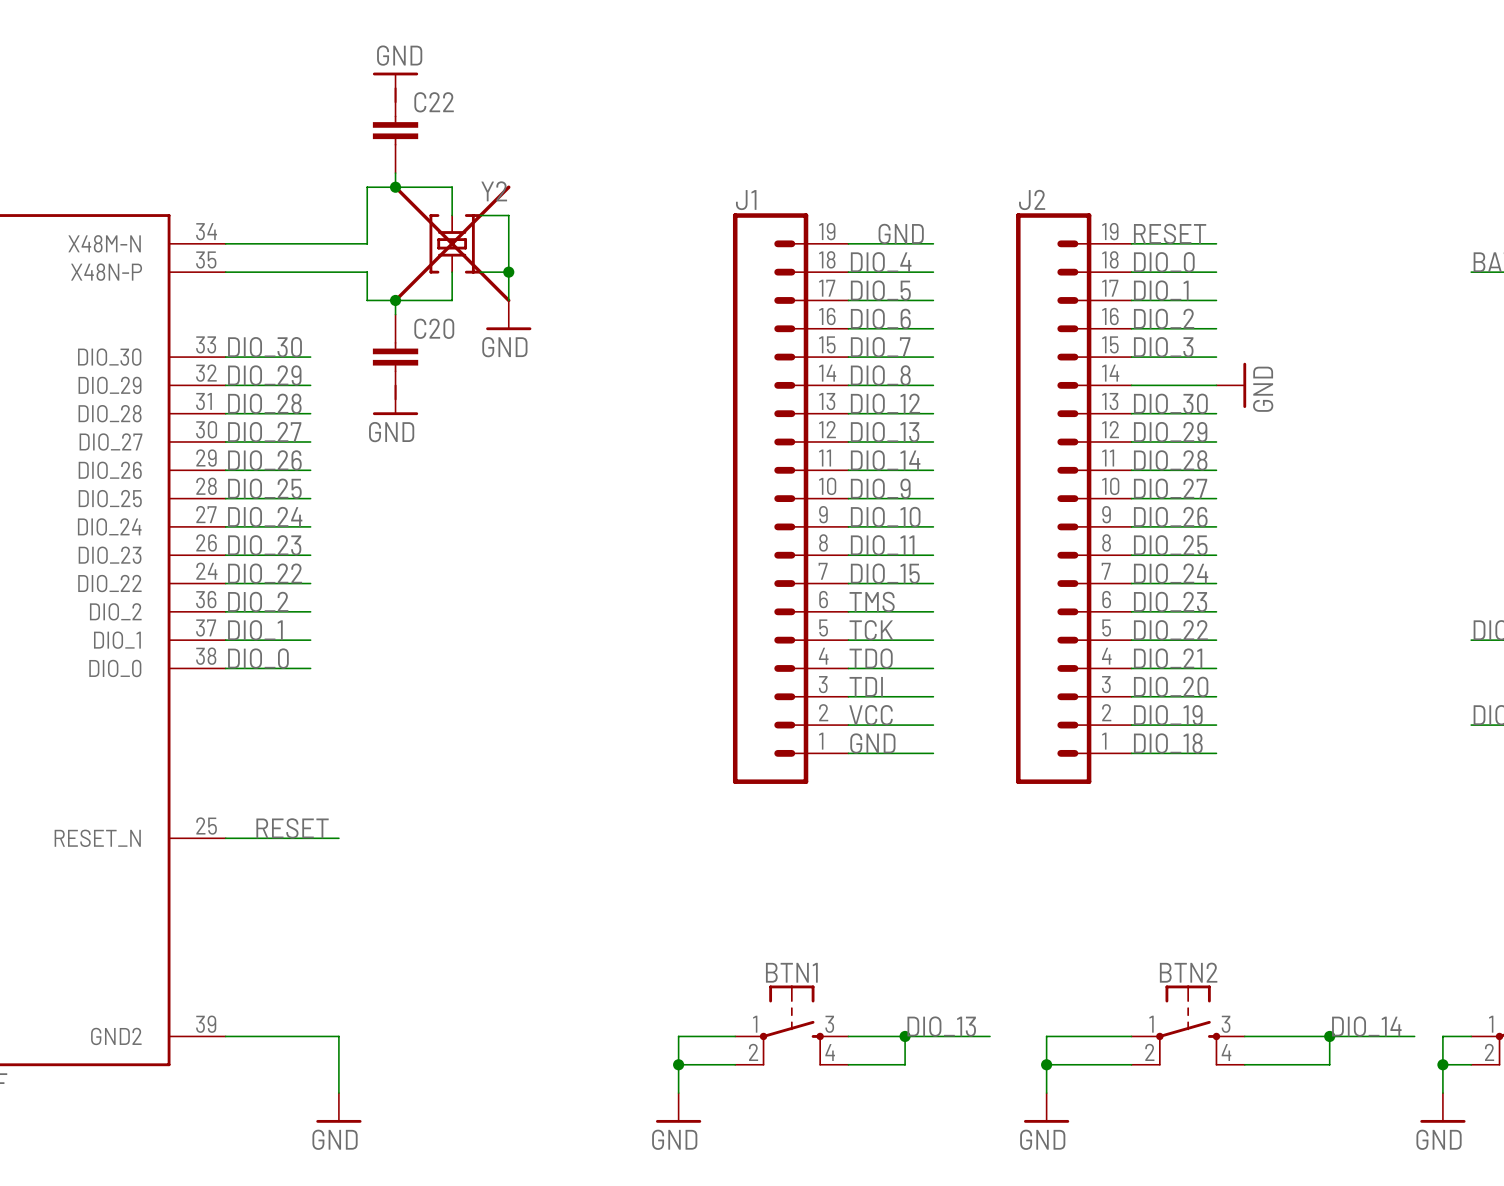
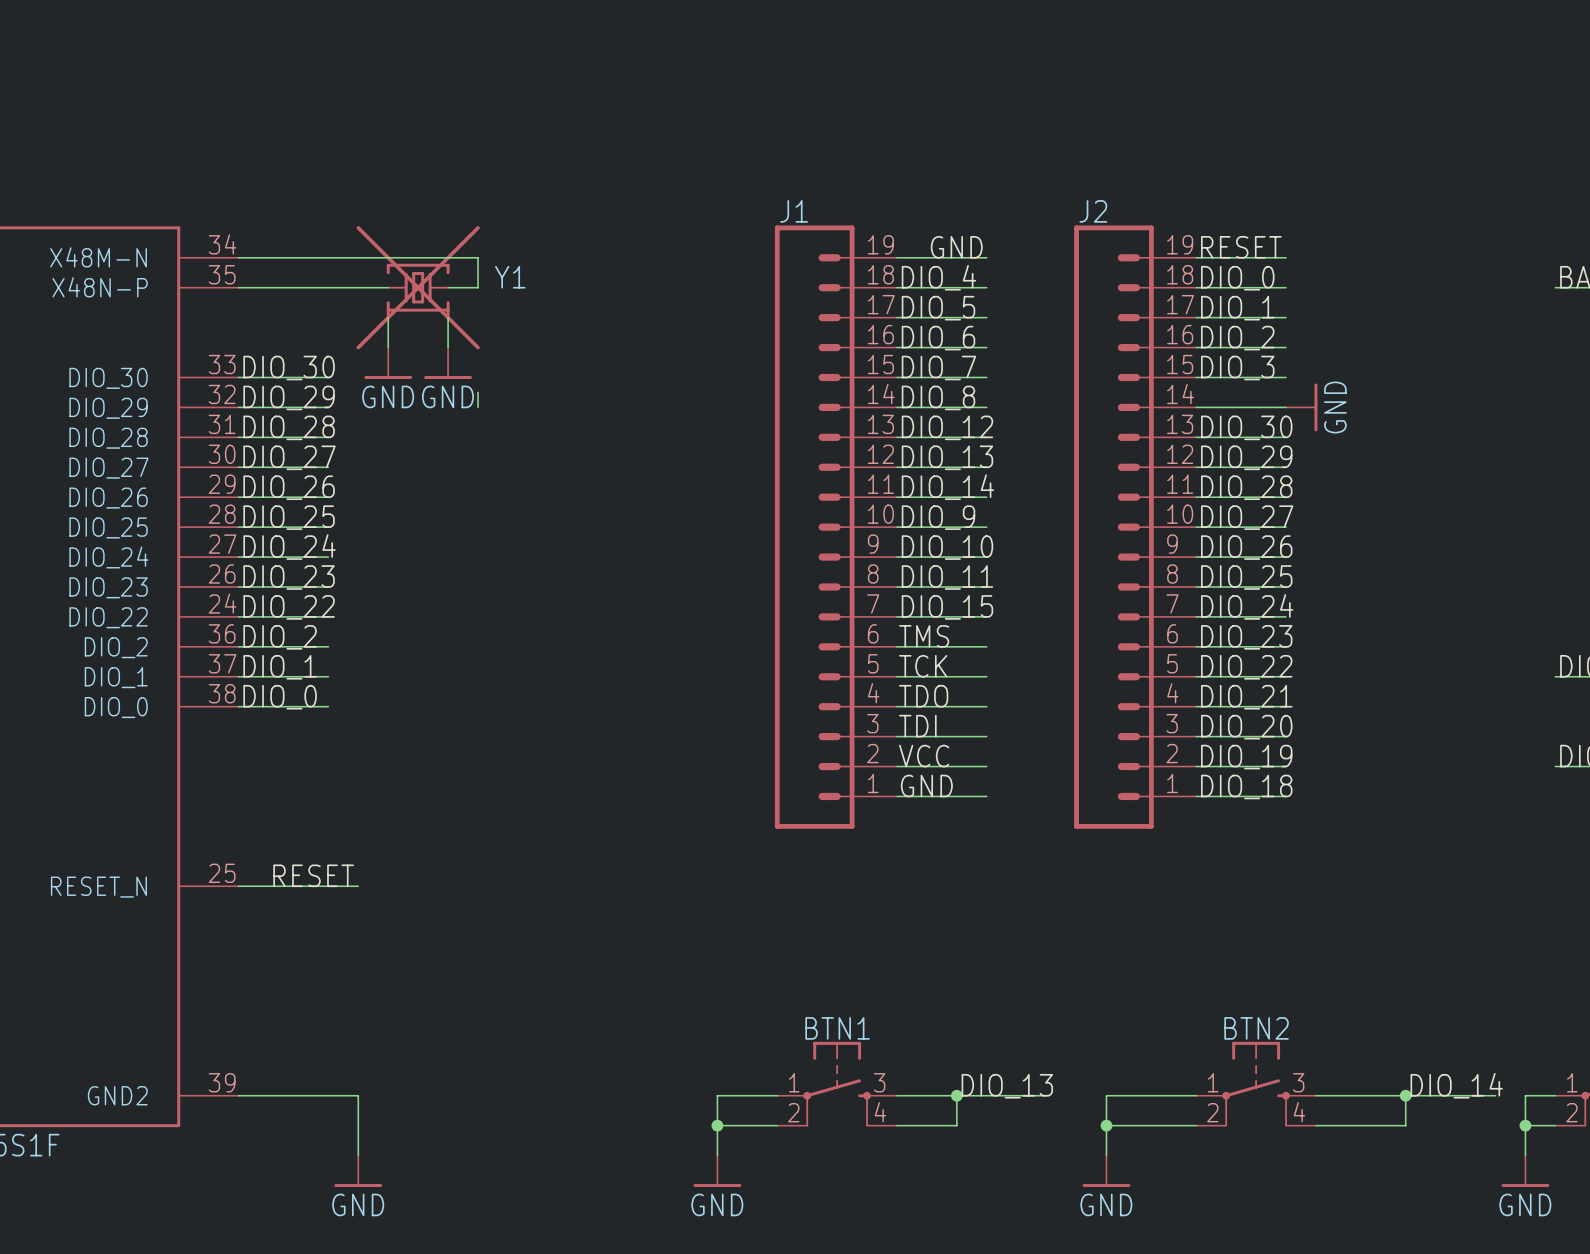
power symbol: GND (395, 87) -> none
C22: (395, 130) -> none
wire: (395, 173) (395, 187) -> none
line: (395, 187) (508, 300) -> (358, 227) (478, 347)
junction: (395, 187) -> none
line: (508, 187) (395, 300) -> (478, 227) (358, 347)
wire: (452, 215) (452, 187) (367, 187) (367, 243) -> (448, 287) (478, 287) (478, 257) (388, 257)
wire: (480, 215) (508, 215) (508, 300) -> none
Y2: (455, 243) -> none
wire: (367, 272) (367, 300) (452, 300) (452, 272) -> none
wire: (480, 272) (508, 272) -> none
junction: (508, 272) -> none
Y1: none -> (418, 291)
wire: none -> (388, 317) (388, 347)
wire: (395, 300) (395, 314) -> (478, 392) (478, 407)
junction: (395, 300) -> none
wire: none -> (448, 317) (448, 347)
power symbol: GND (508, 315) -> none
power symbol: none -> GND (388, 363)
power symbol: none -> GND (448, 363)
C20: (395, 357) -> none
power symbol: GND (395, 400) -> none

